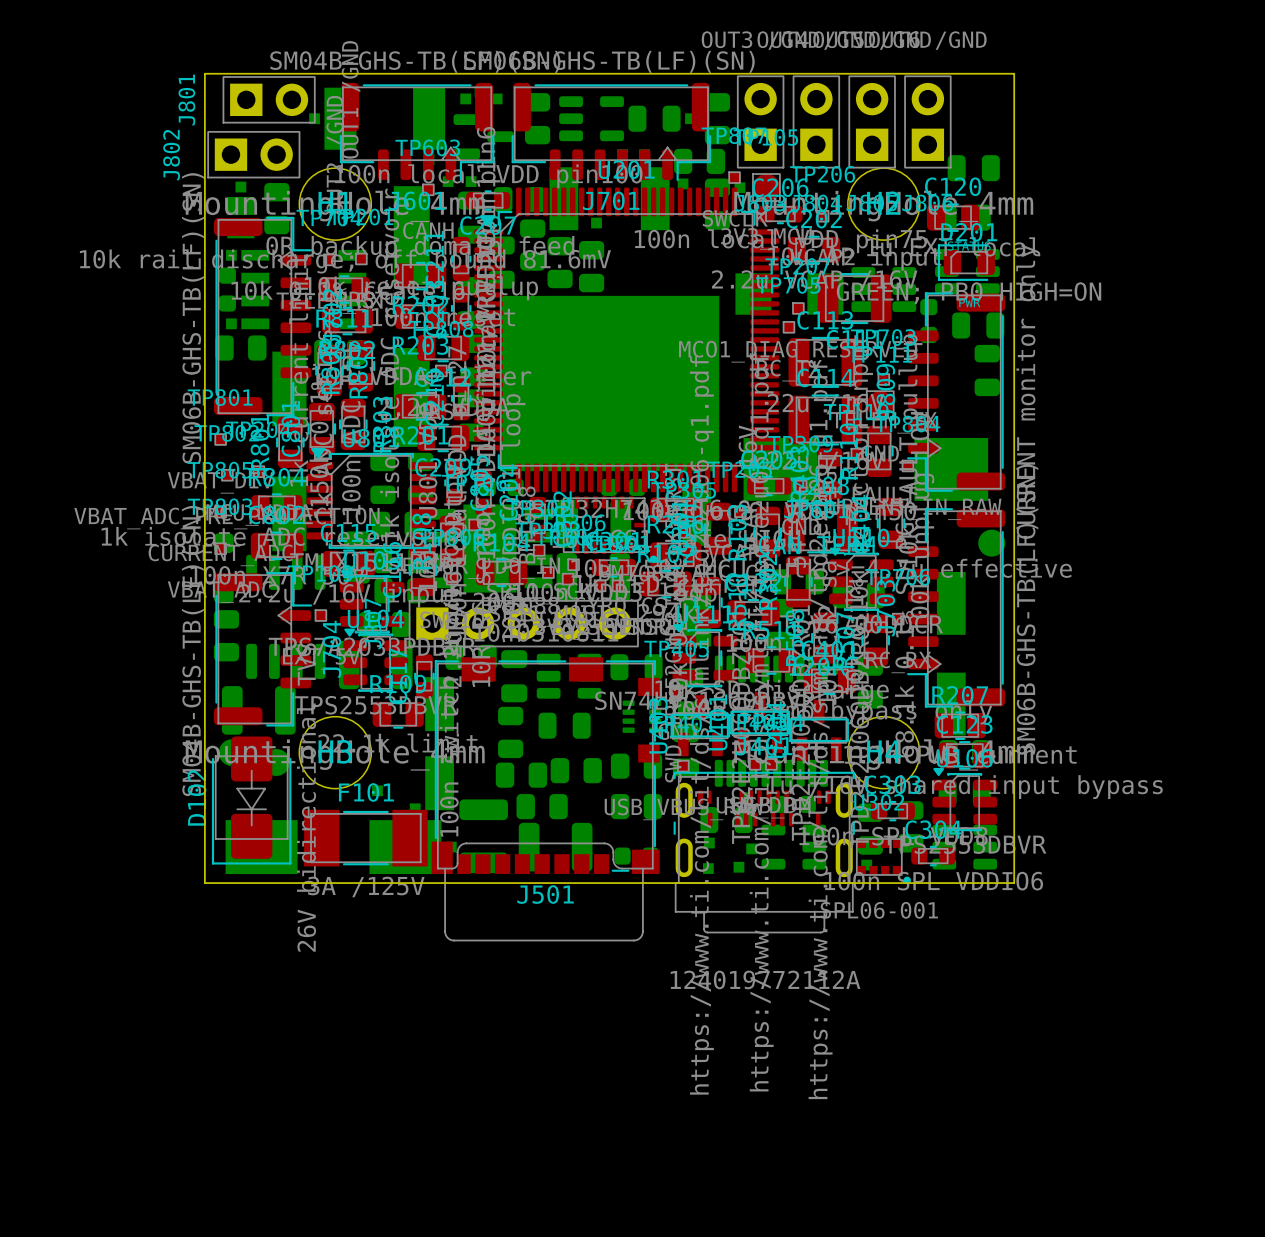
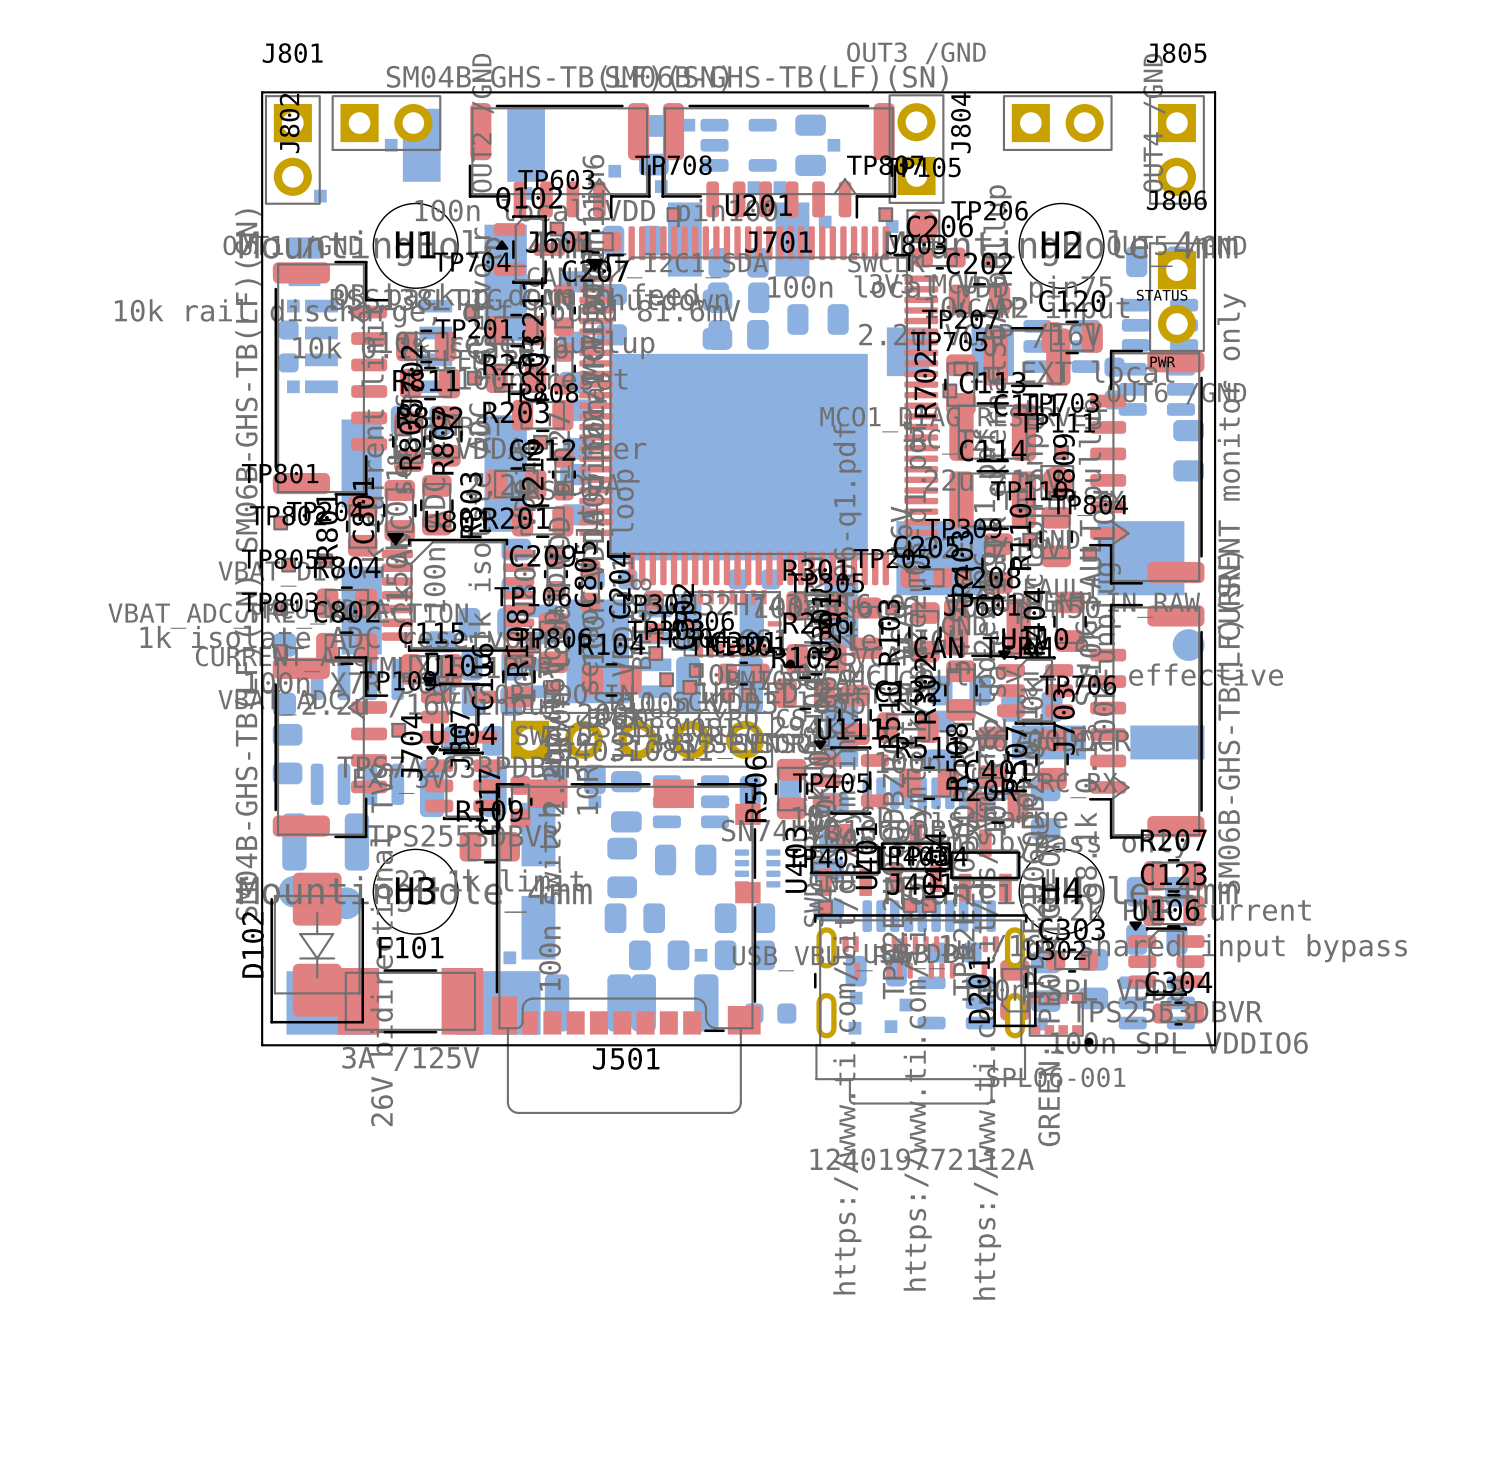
part: (465, 98) -> none
TP708 side: bottom (497, 98) -> top (674, 214)
J801 rotation: 0° (269, 99) -> 90° clockwise (292, 149)
part: none -> (688, 125)
part position: (591, 118) -> (738, 145)
part rotation: 0° (654, 118) -> 90° clockwise (810, 145)
part: (717, 118) -> none
J804 rotation: 0° (816, 121) -> 90° clockwise (1057, 123)
J804 position: (816, 121) -> (1057, 123)
J805 rotation: 0° (872, 121) -> 180° (1176, 149)
J805 position: (872, 121) -> (1176, 149)
J806 rotation: 0° (927, 121) -> 180° (1176, 297)
J806 position: (927, 121) -> (1176, 297)
J601 position: (417, 131) -> (559, 160)
J701 position: (611, 131) -> (778, 160)
Q102 side: bottom (483, 136) -> top (529, 249)
part: none -> (614, 171)
part: none -> (661, 186)
J802 position: (253, 154) -> (386, 123)
part: (699, 161) -> none
part: (973, 168) -> none
part: (448, 181) -> none
part: (471, 181) -> none
part position: (240, 187) -> (320, 196)
TP603 position: (428, 189) -> (557, 229)
part: (717, 204) -> none
part: (276, 208) -> none
part footprint: [591, 217, 602, 229] -> [708, 247, 769, 278]
C120 position: (953, 217) -> (1072, 337)
R702 side: bottom (532, 245) -> top (960, 384)
part: none -> (738, 297)
TP201 position: (361, 258) -> (474, 378)
TP704 position: (329, 259) -> (472, 311)
part rotation: 0° (560, 262) -> 90° clockwise (738, 334)
part position: (560, 262) -> (738, 334)
D201 rotation: 0° (966, 262) -> 90° counterclockwise (1014, 993)
D201 position: (966, 262) -> (1014, 993)
part: none -> (818, 319)
part footprint: [952, 312, 1005, 339] -> [1118, 362, 1195, 416]
part footprint: [974, 344, 1000, 397] -> [1173, 420, 1204, 482]
part: (240, 348) -> none
part: (382, 478) -> none
TP106 position: (474, 524) -> (533, 646)
J704 position: (263, 649) -> (330, 747)
part rotation: 0° (951, 653) -> 90° clockwise (1108, 742)
TP405 position: (677, 690) -> (831, 832)
part position: (641, 716) -> (757, 868)
R207 position: (960, 725) -> (1173, 875)
C123 position: (964, 755) -> (1173, 910)
part: (636, 766) -> none
R506 side: bottom (576, 770) -> top (791, 789)
part: none -> (744, 918)
part position: (377, 790) -> (701, 955)
J501 position: (545, 799) -> (626, 946)
U106 position: (964, 799) -> (1166, 958)
part: none -> (744, 955)
part: (636, 806) -> none
part rotation: 0° (483, 836) -> 90° clockwise (588, 1002)
F101 position: (365, 838) -> (410, 1001)
C304 position: (933, 856) -> (1178, 1013)

